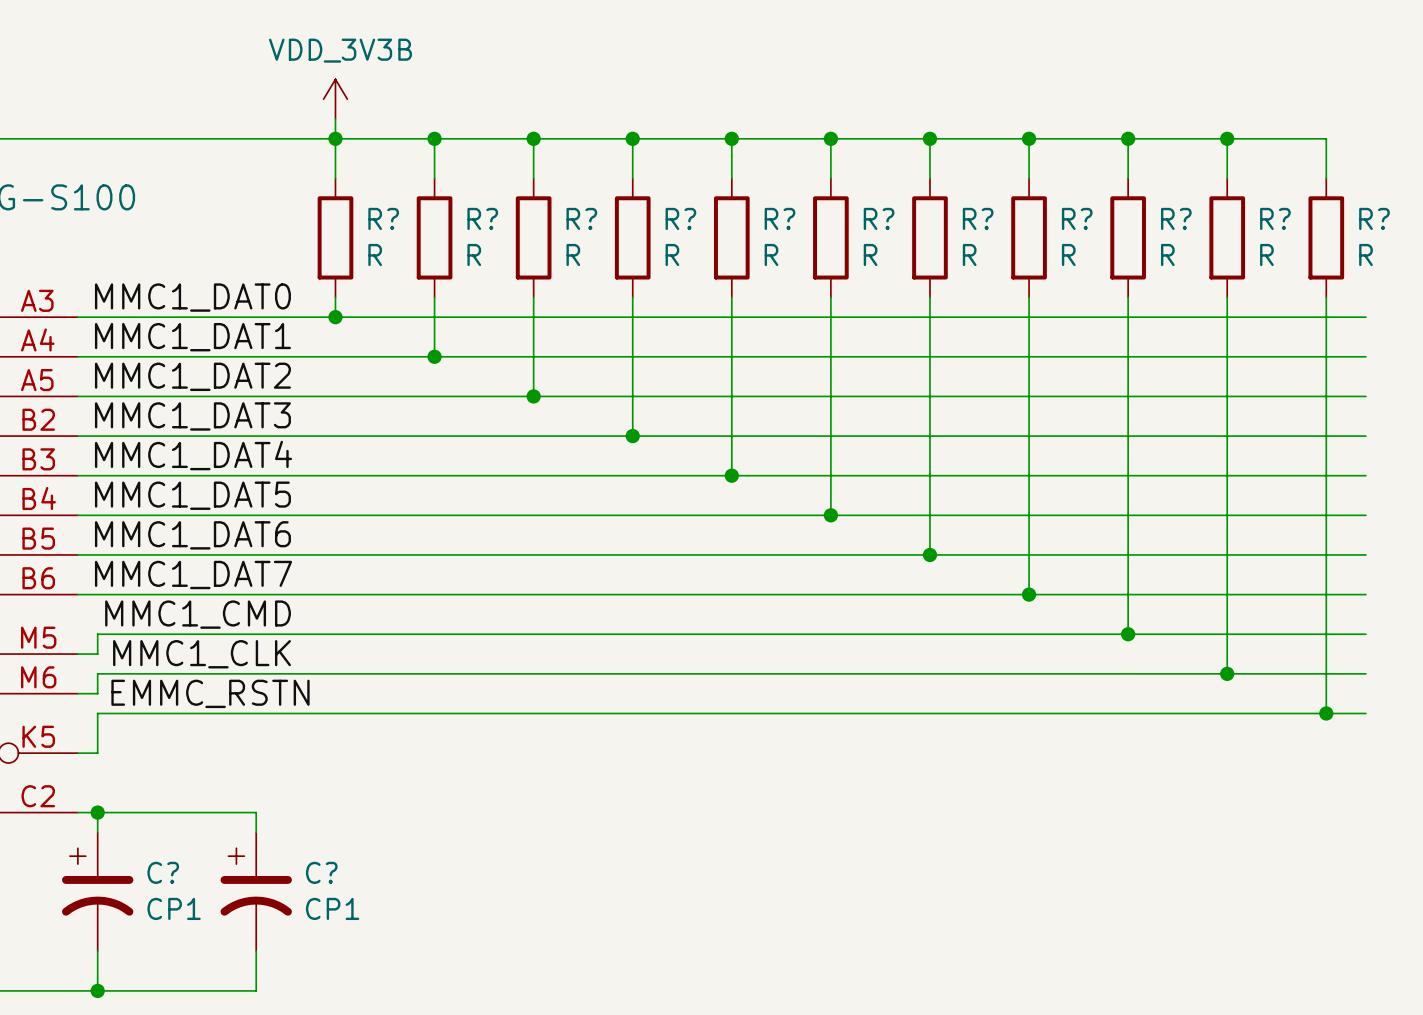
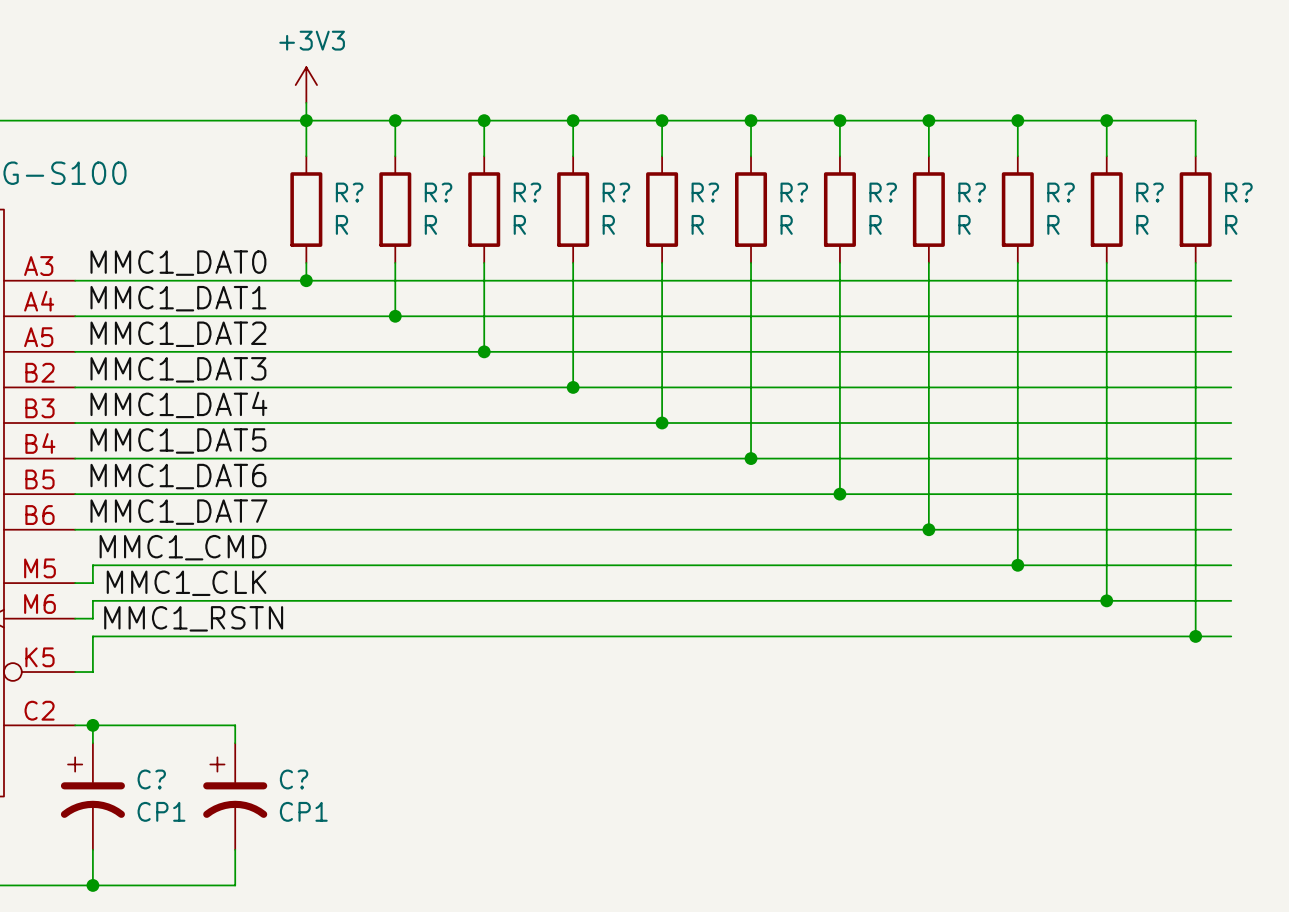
power symbol: VDD_3V3B (335, 99) -> +3V3 (306, 85)
label: EMMC_RSTN (210, 693) -> MMC1_RSTN (193, 618)

